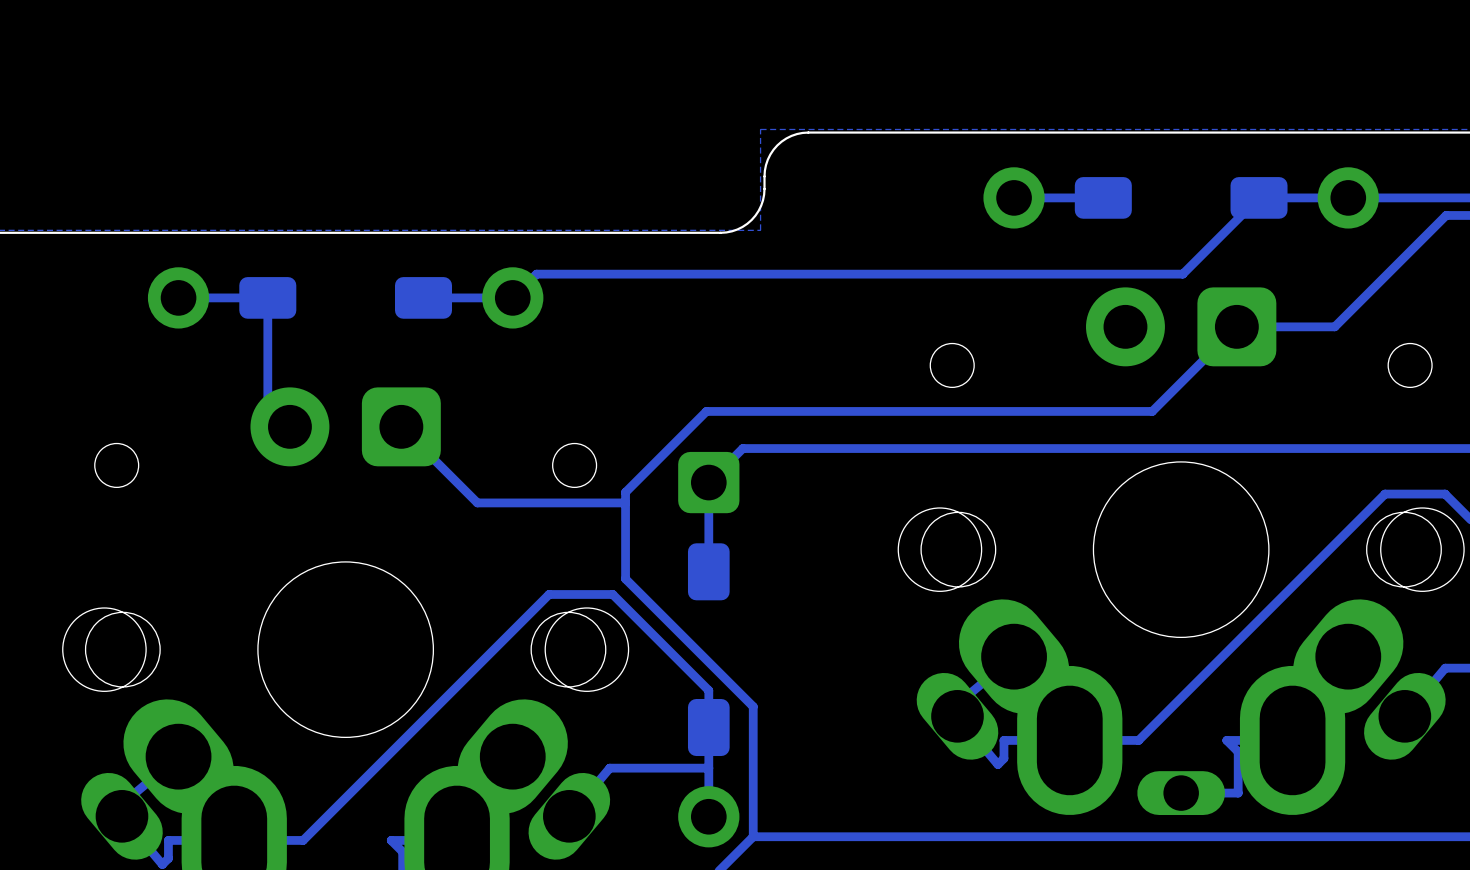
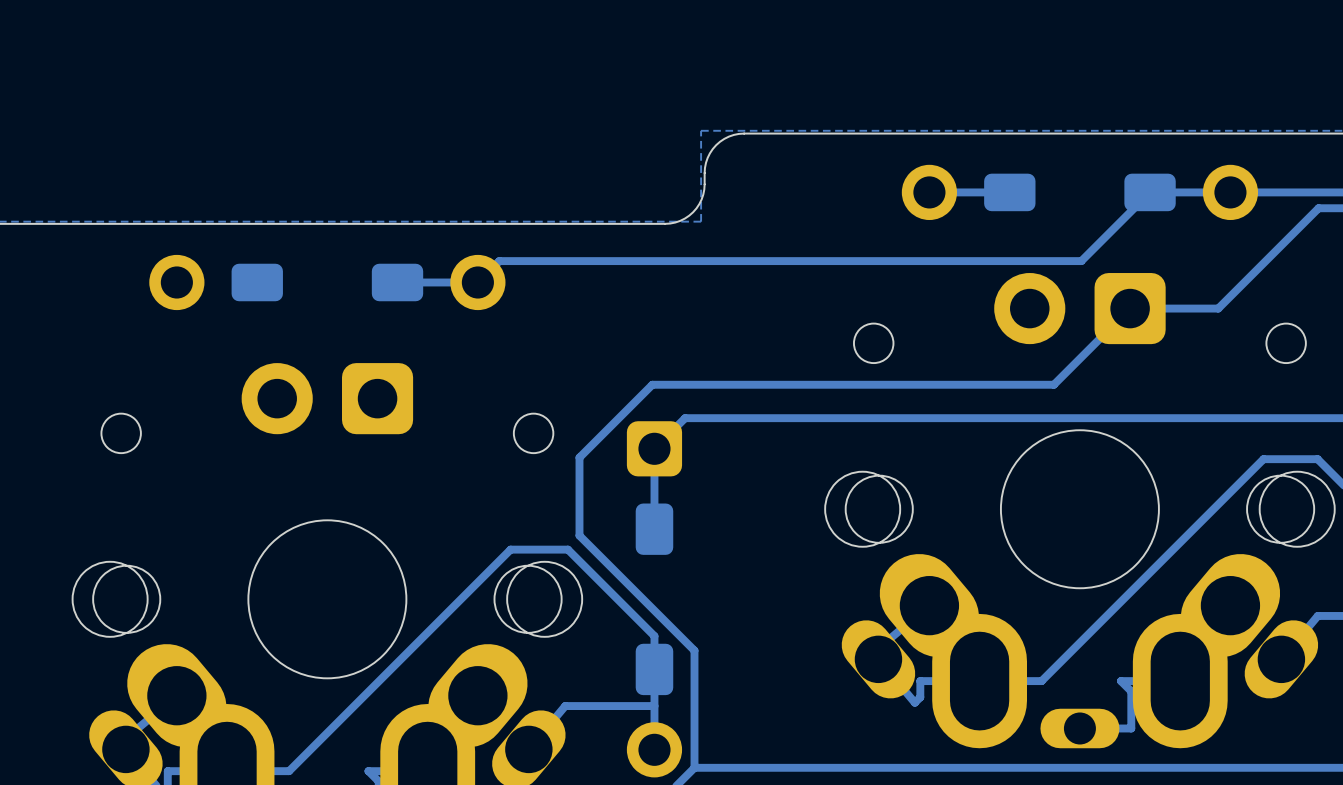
track: (178, 297) (267, 297) (267, 404) (289, 426) -> none
track: (401, 426) (477, 502) (625, 502) -> none

